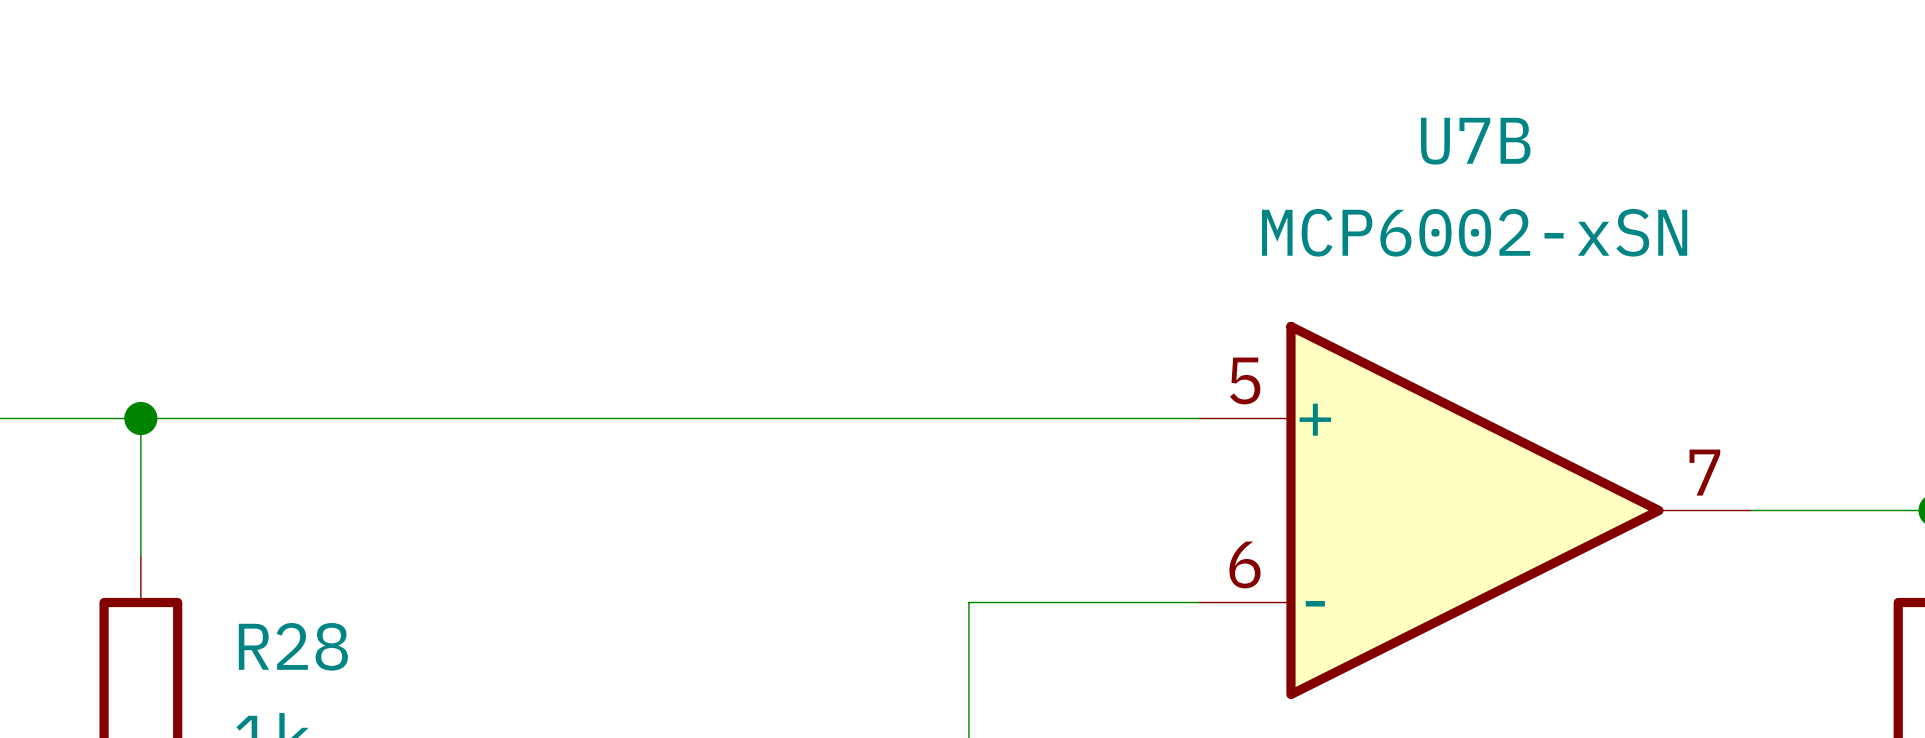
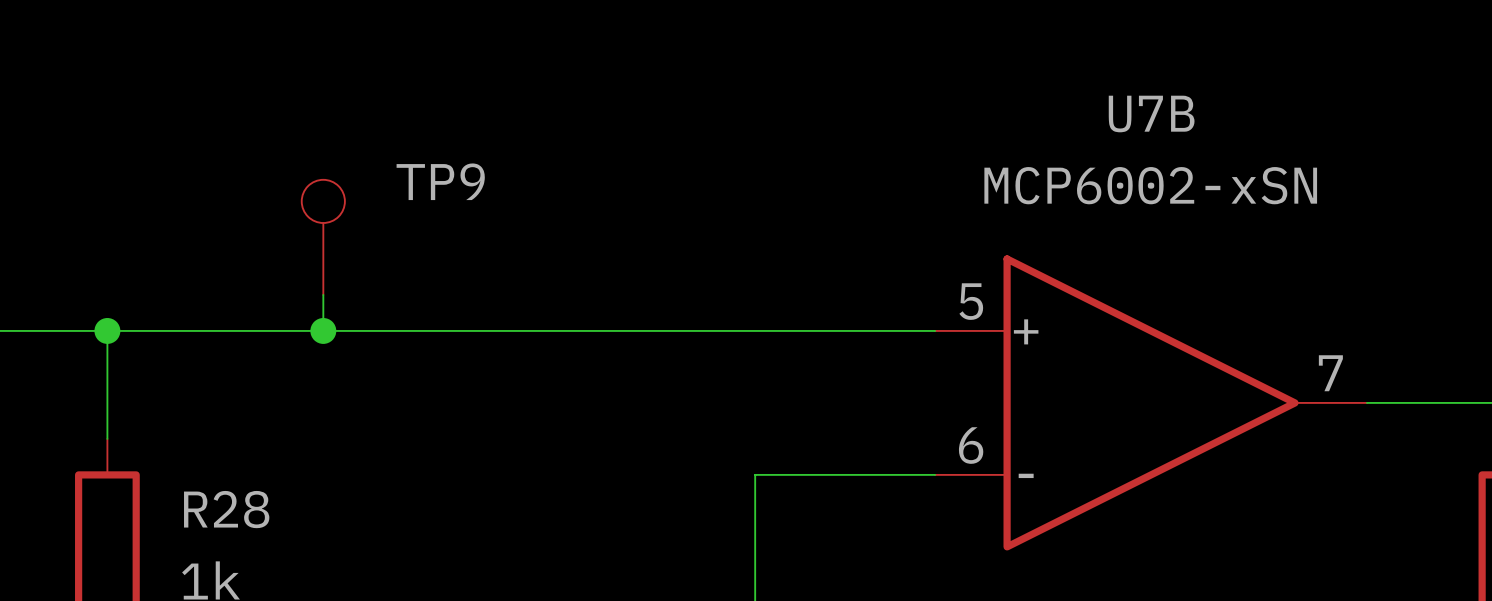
TP9: none -> (323, 237)
wire: none -> (323, 294) (323, 330)
junction: none -> (323, 330)

